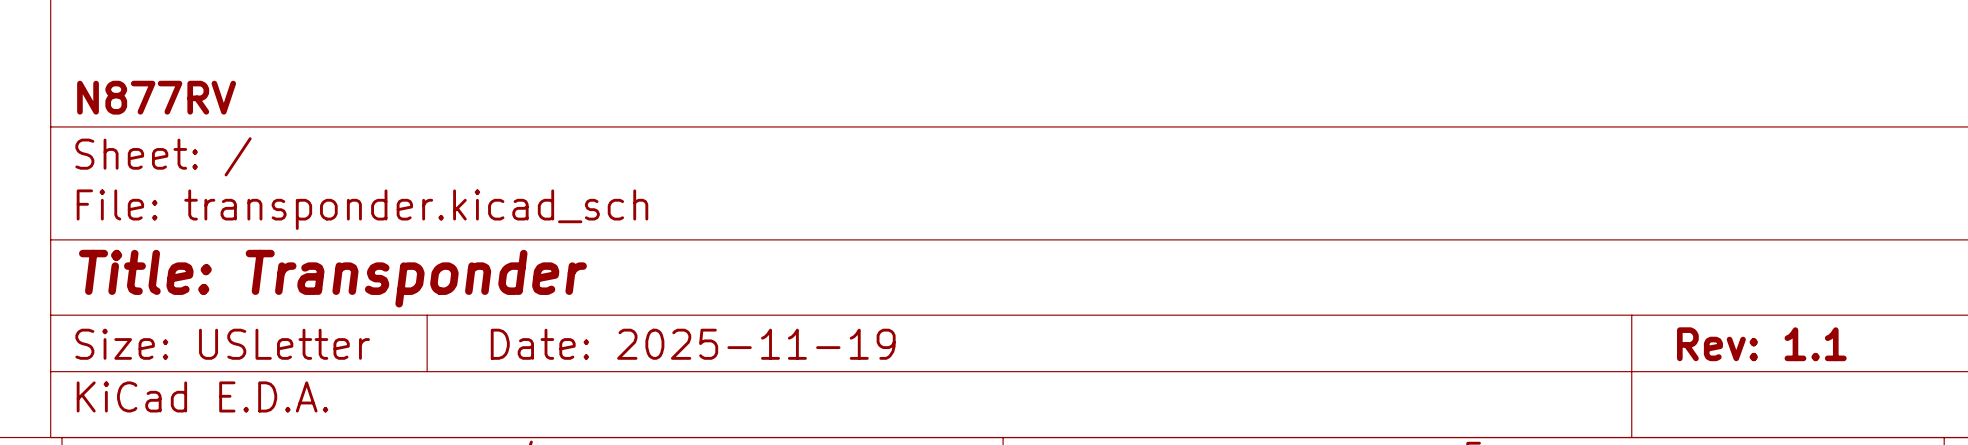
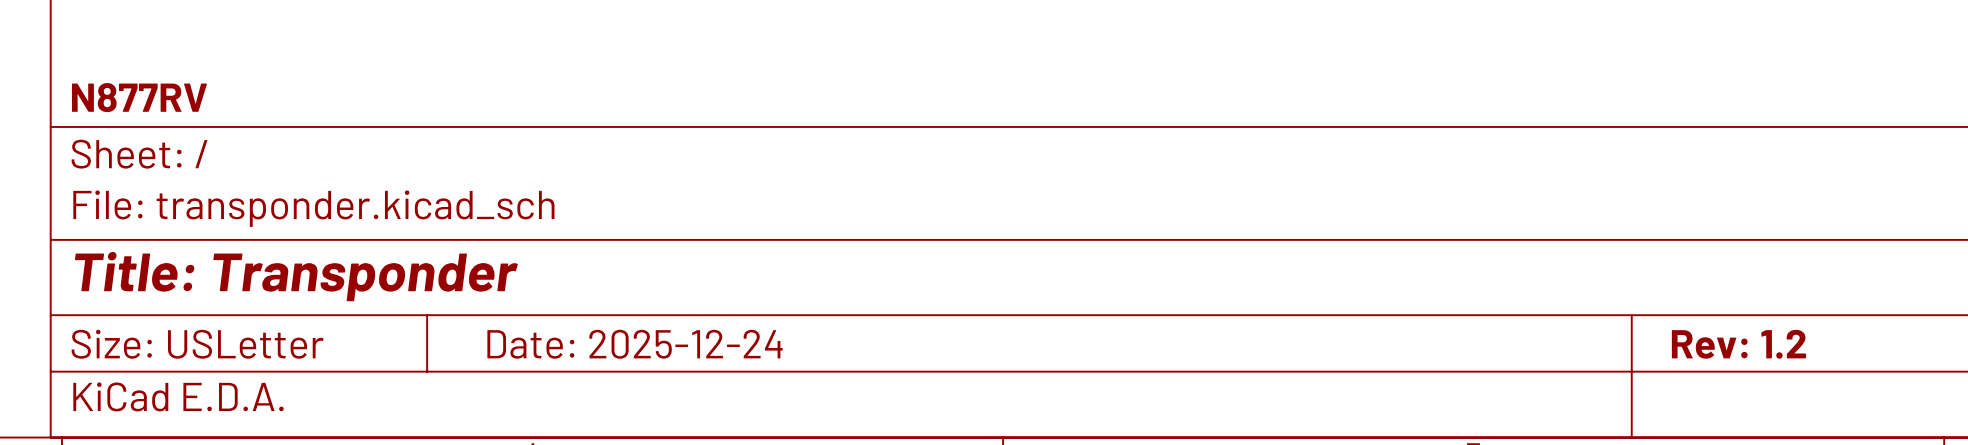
title block: Date: 2025-11-19 (693, 344) -> Date: 2025-12-24 (635, 344)
title block: Rev: 1.1 (1761, 344) -> Rev: 1.2 (1738, 344)

